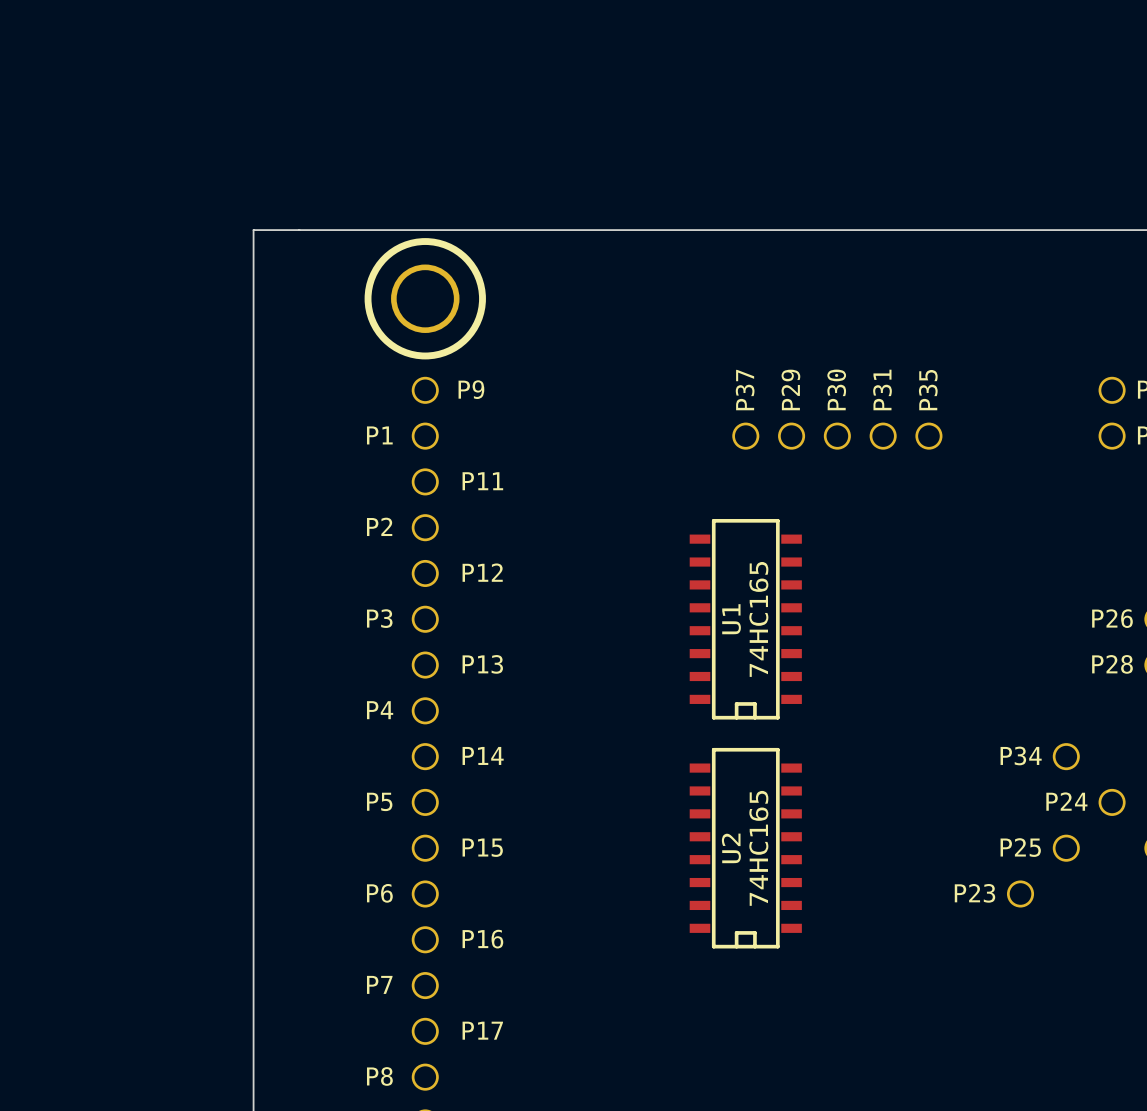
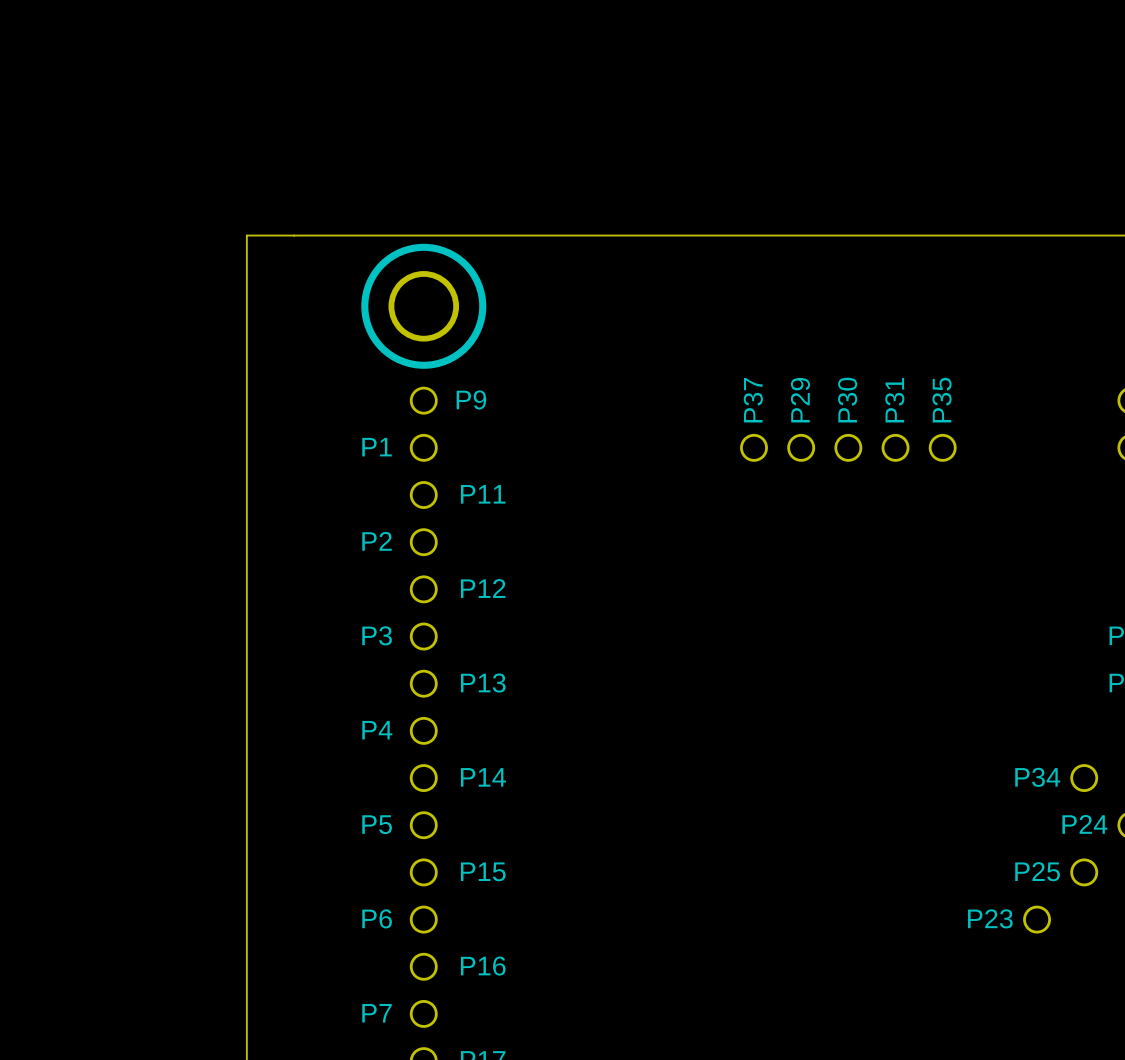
U1: 74HC165 (745, 619) -> none
U2: 74HC165 (745, 848) -> none

